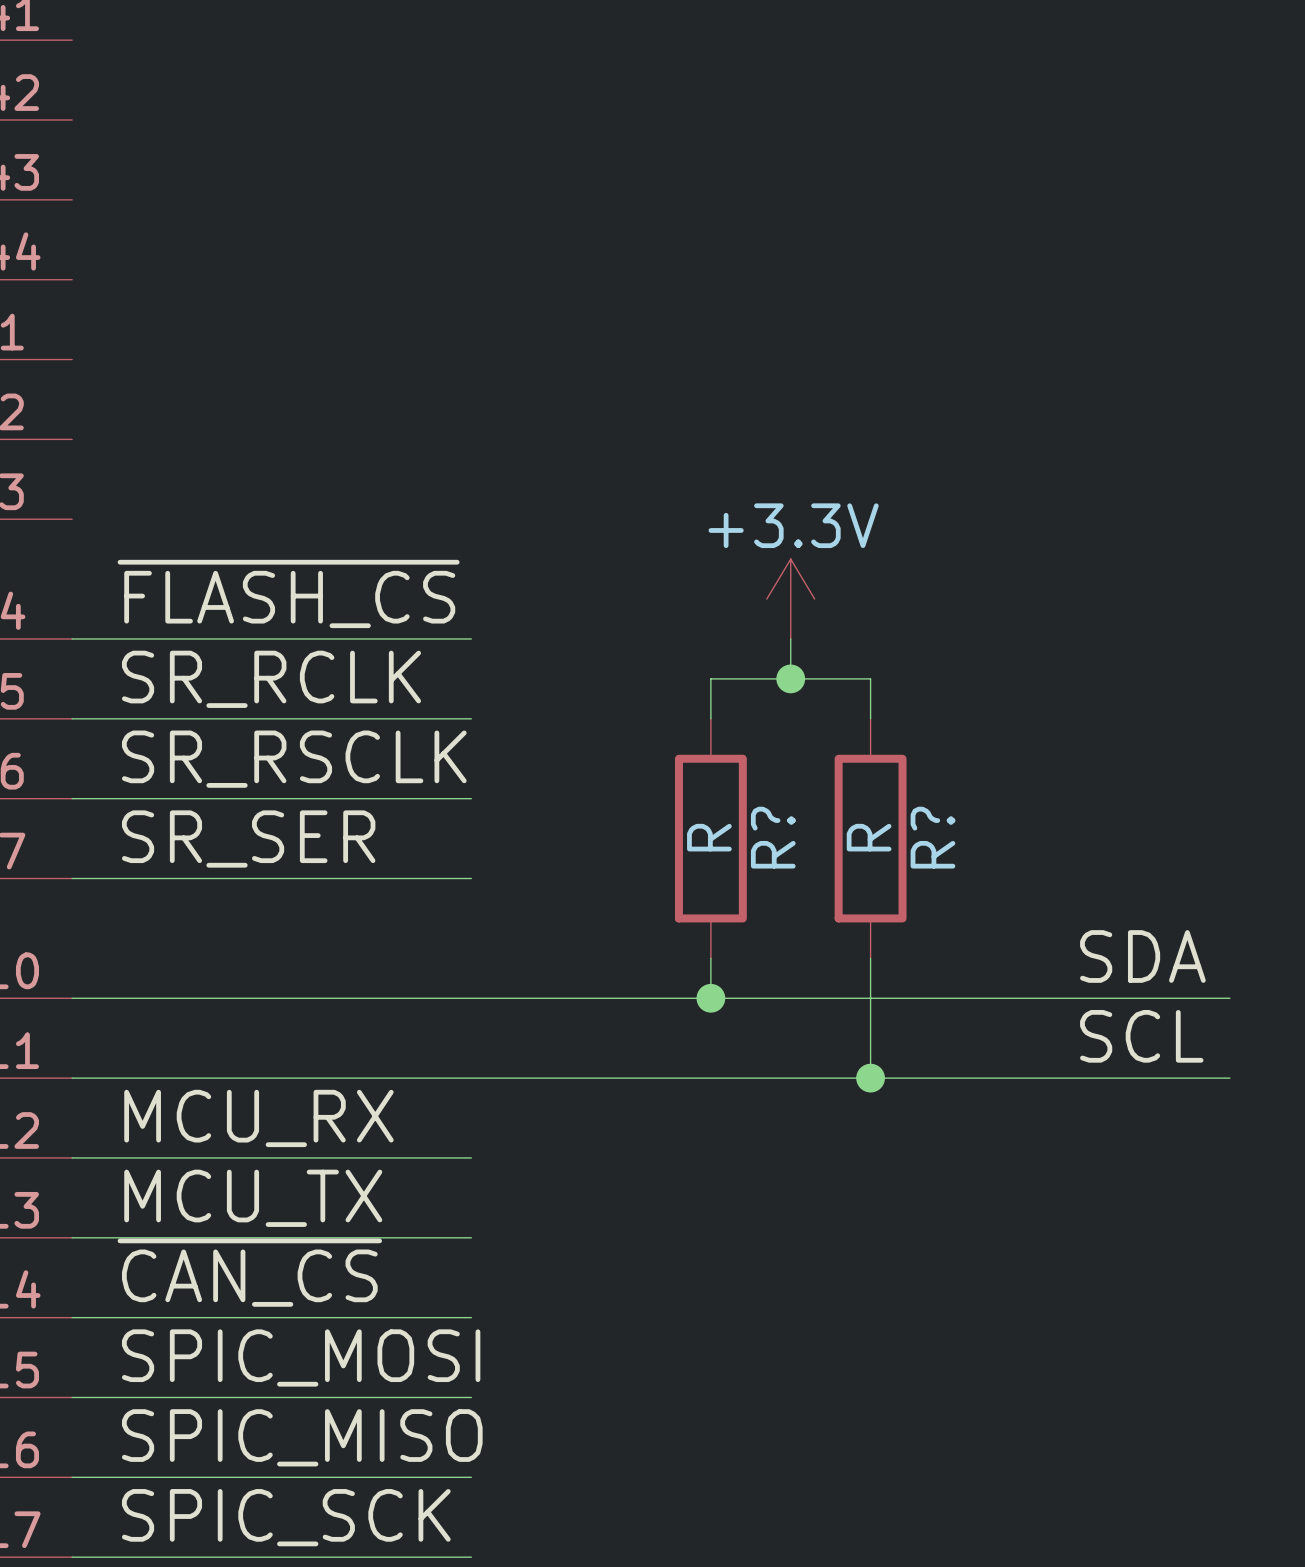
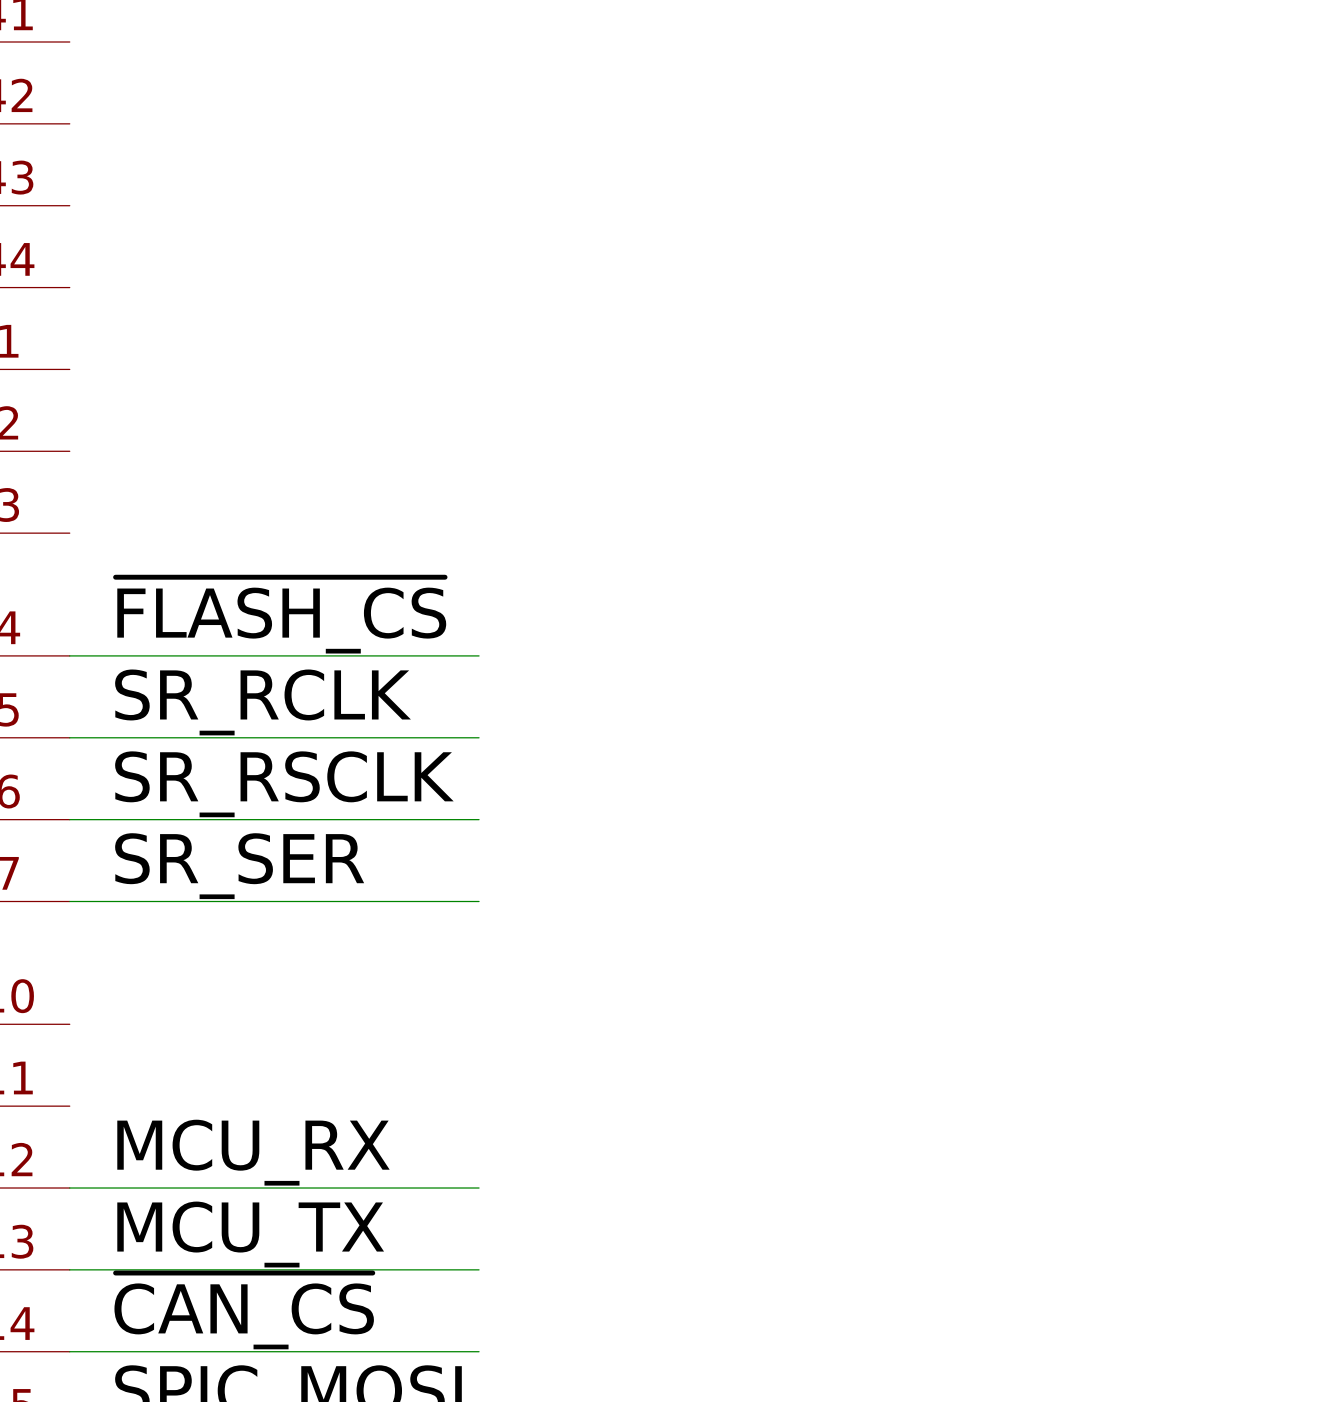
power symbol: +3.3V (790, 599) -> none
wire: (790, 638) (790, 678) -> none
junction: (790, 678) -> none
wire: (710, 718) (710, 678) (870, 678) (870, 718) -> none
R?: R (710, 838) -> none
R?: R (870, 838) -> none
label: SDA (1142, 956) -> none
wire: (710, 958) (710, 998) -> none
wire: (870, 958) (870, 1078) -> none
wire: (72, 998) (1229, 998) -> none
junction: (710, 998) -> none
label: SCL (1141, 1036) -> none
wire: (72, 1078) (1229, 1078) -> none
junction: (870, 1078) -> none

